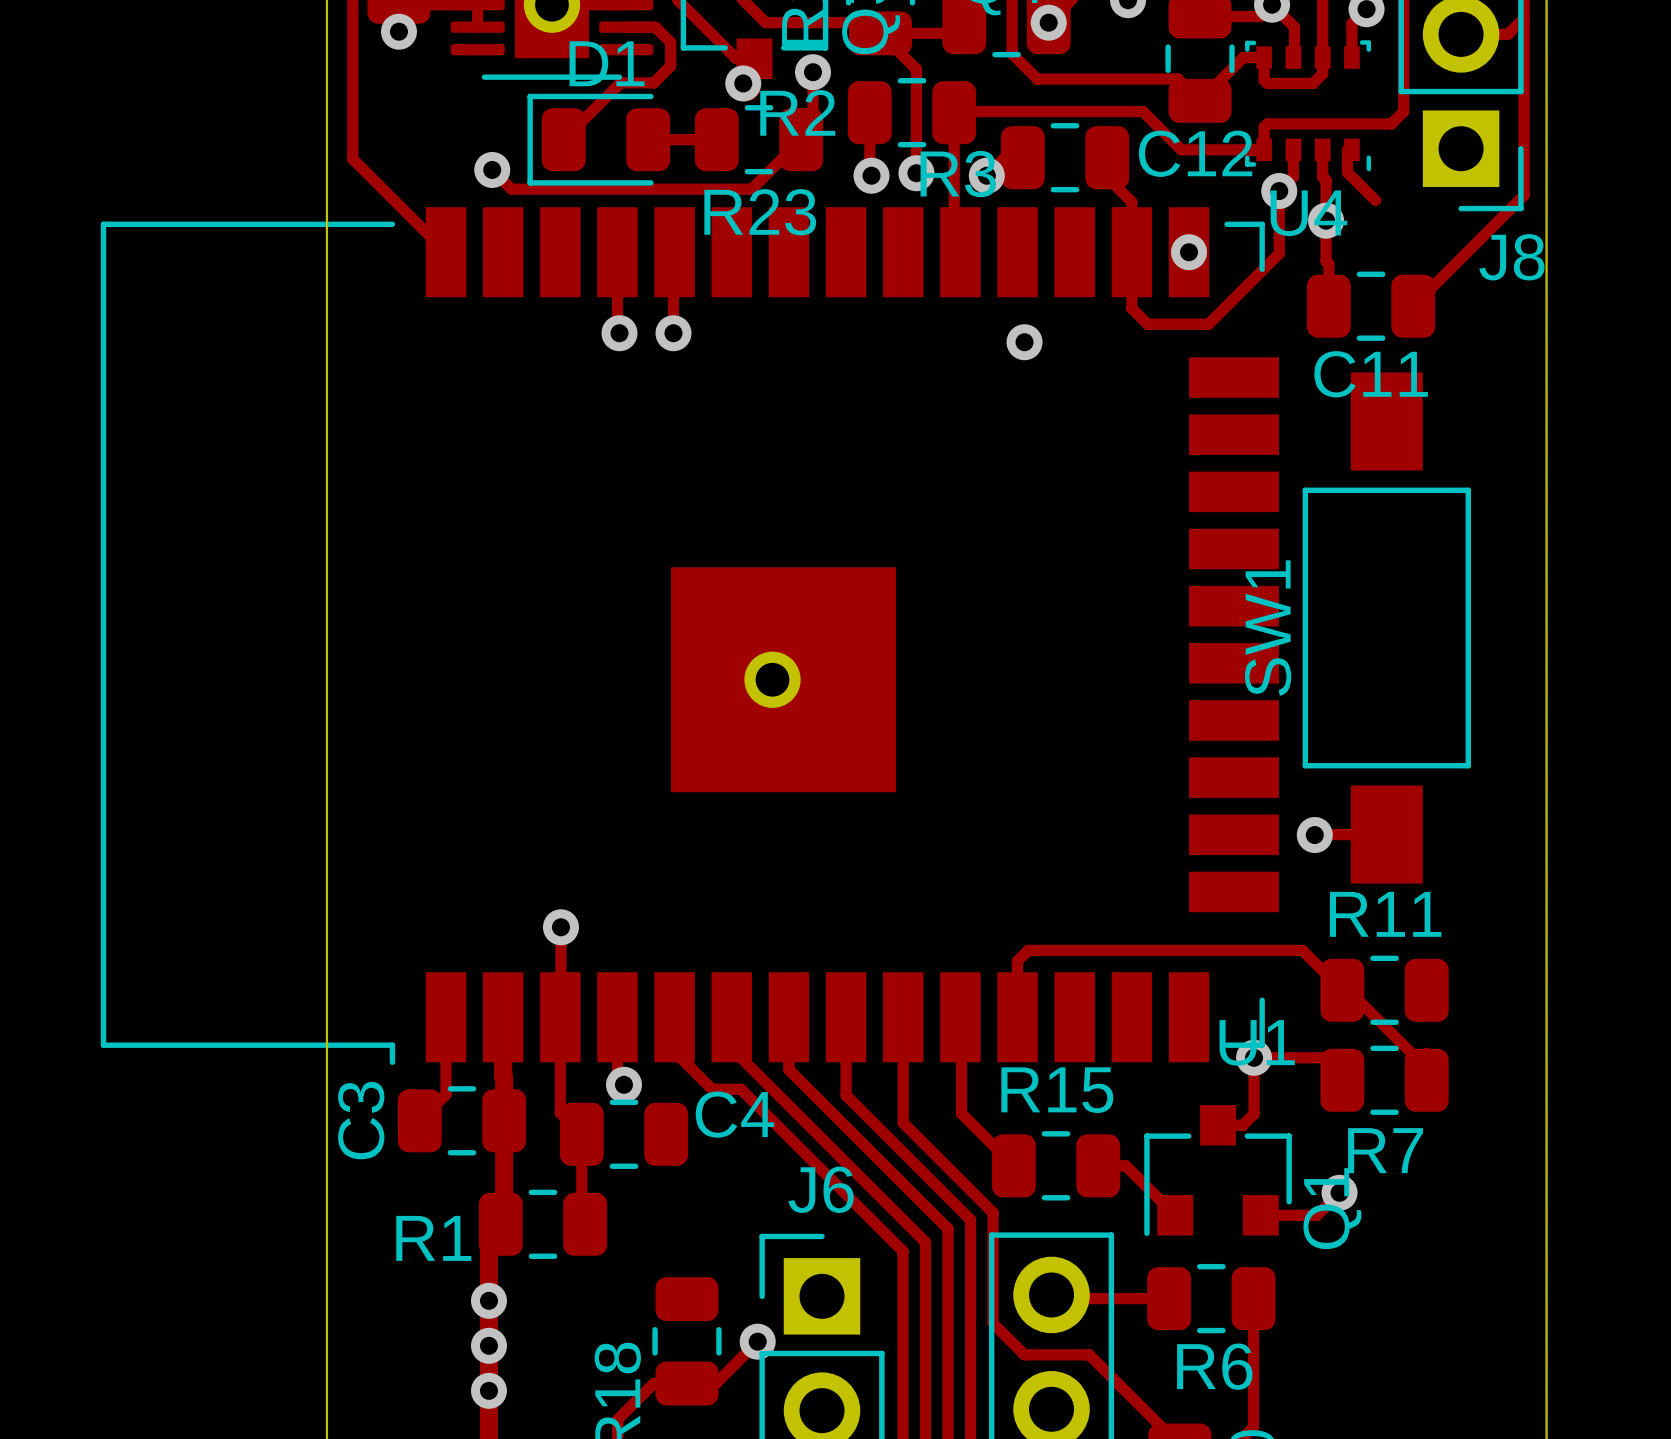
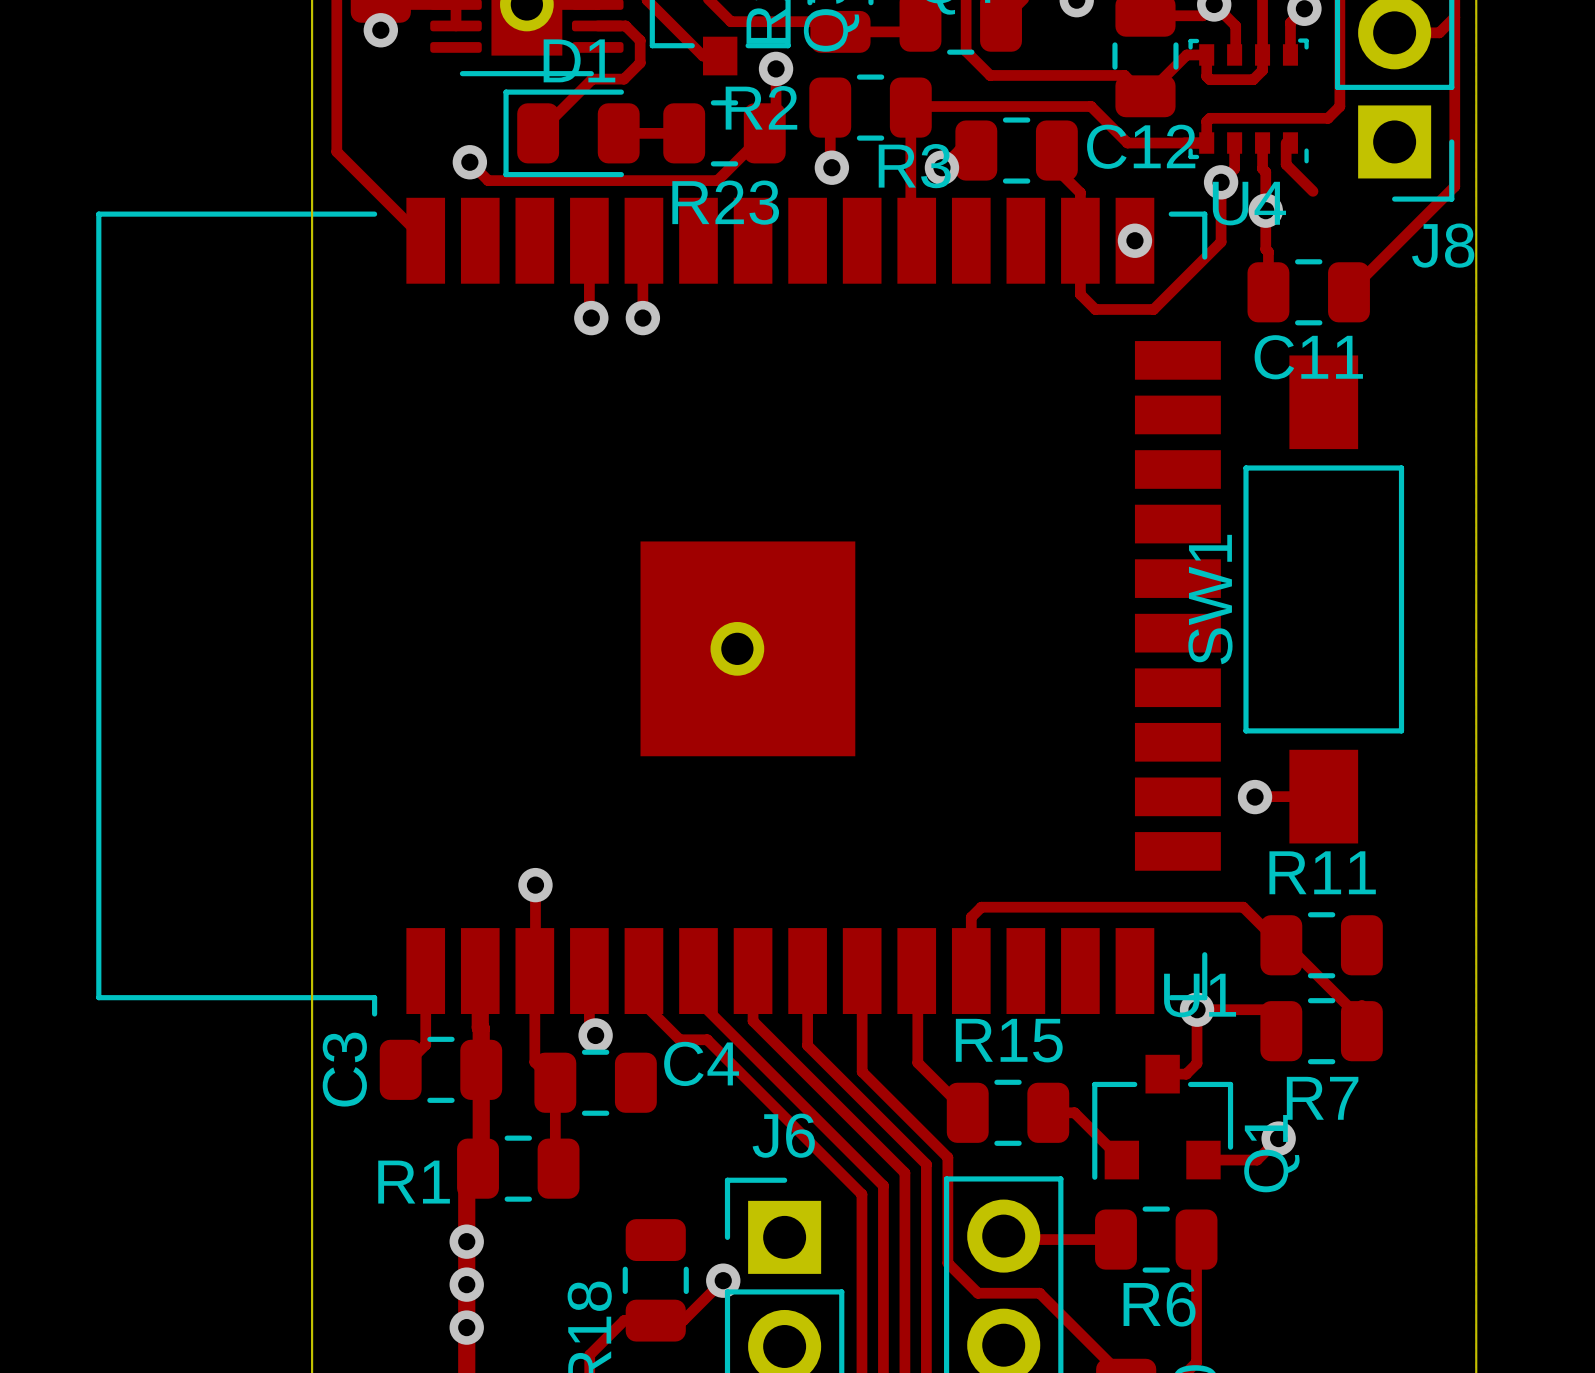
via: (1048, 22) -> none
track: (880, 33) (916, 69) (916, 173) -> none
via: (743, 83) -> none
via: (916, 173) -> none
via: (1024, 342) -> none

